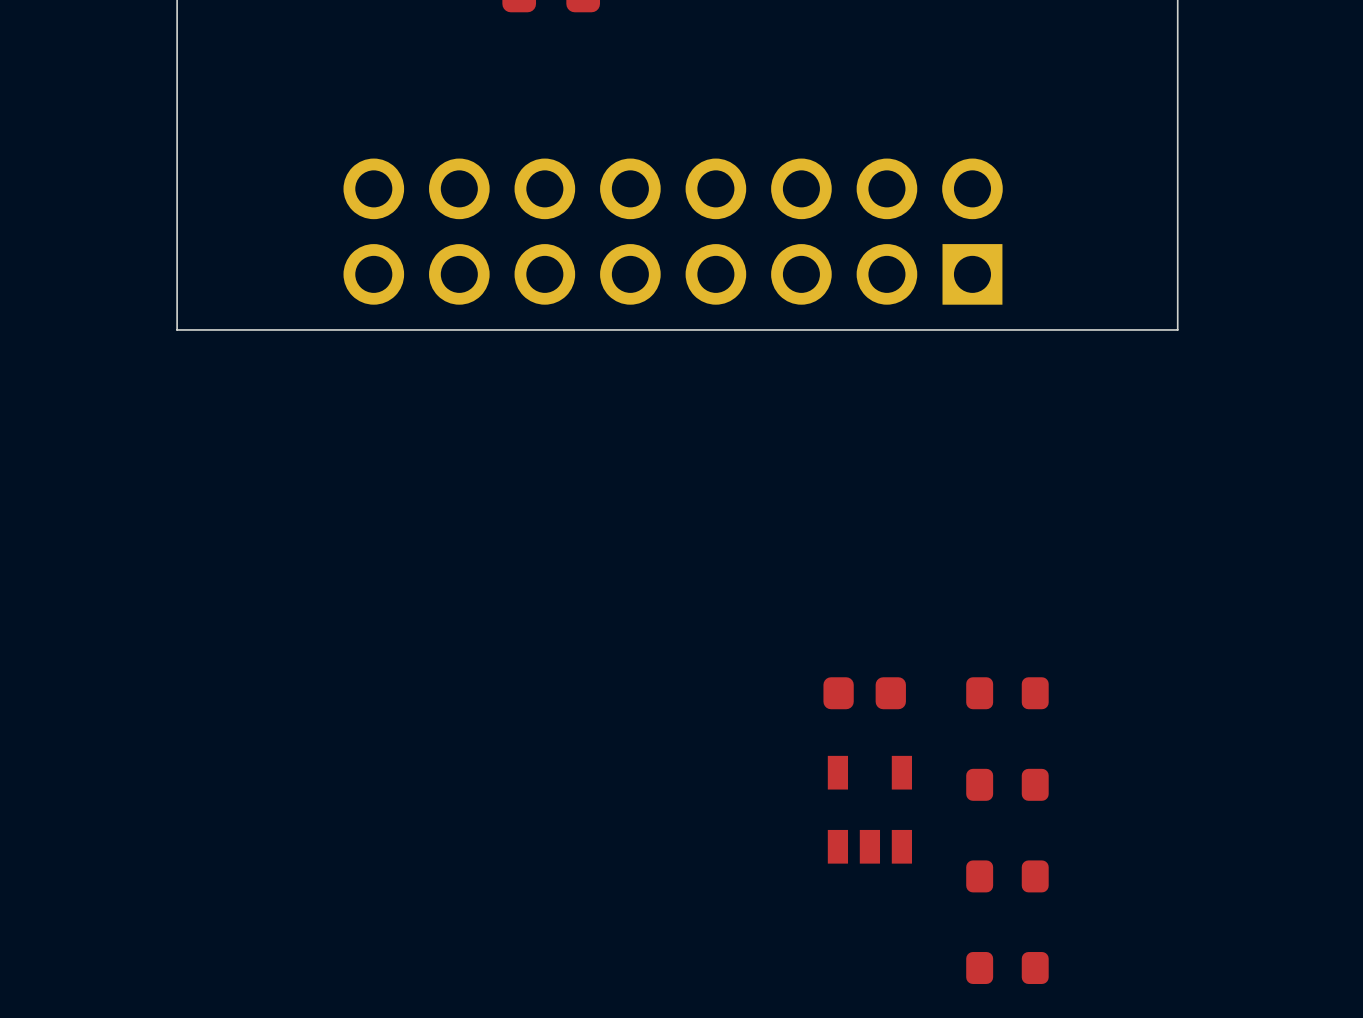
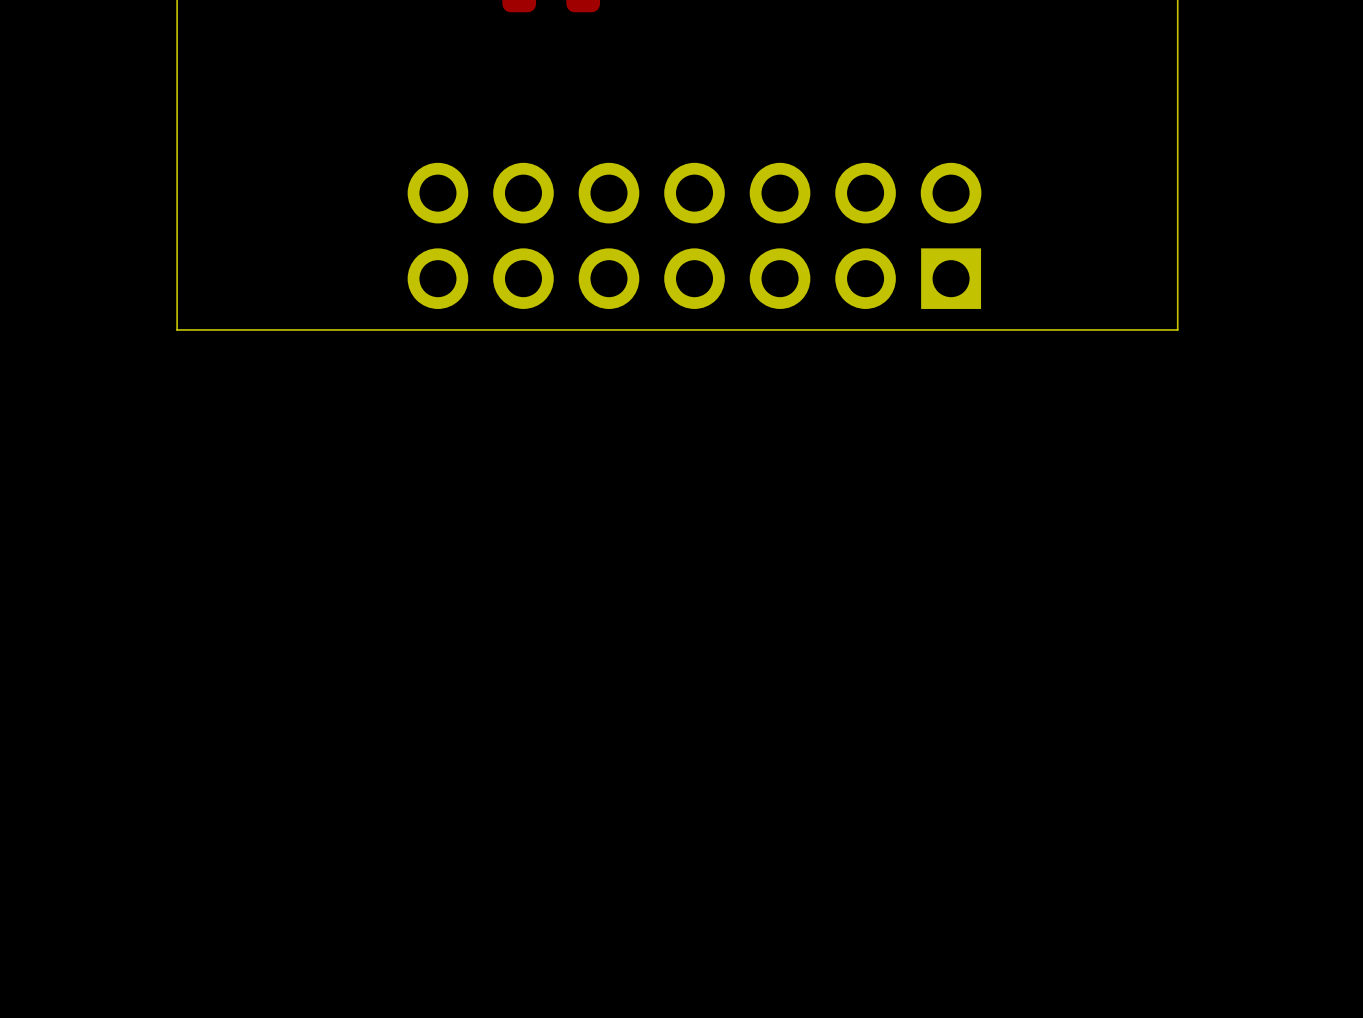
part footprint: [343, 158, 1003, 305] -> [407, 162, 982, 309]
part: (864, 693) -> none
part: (1007, 693) -> none
part: (1007, 784) -> none
part: (869, 809) -> none
part: (1007, 876) -> none
part: (1007, 968) -> none

